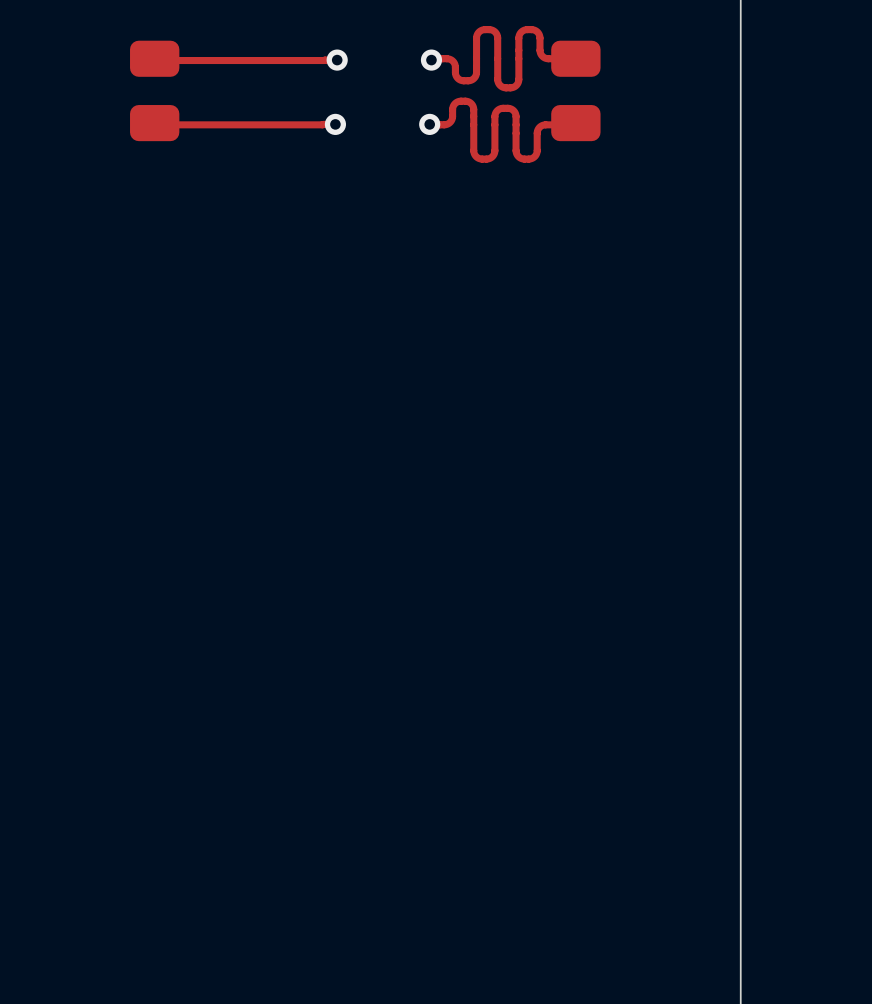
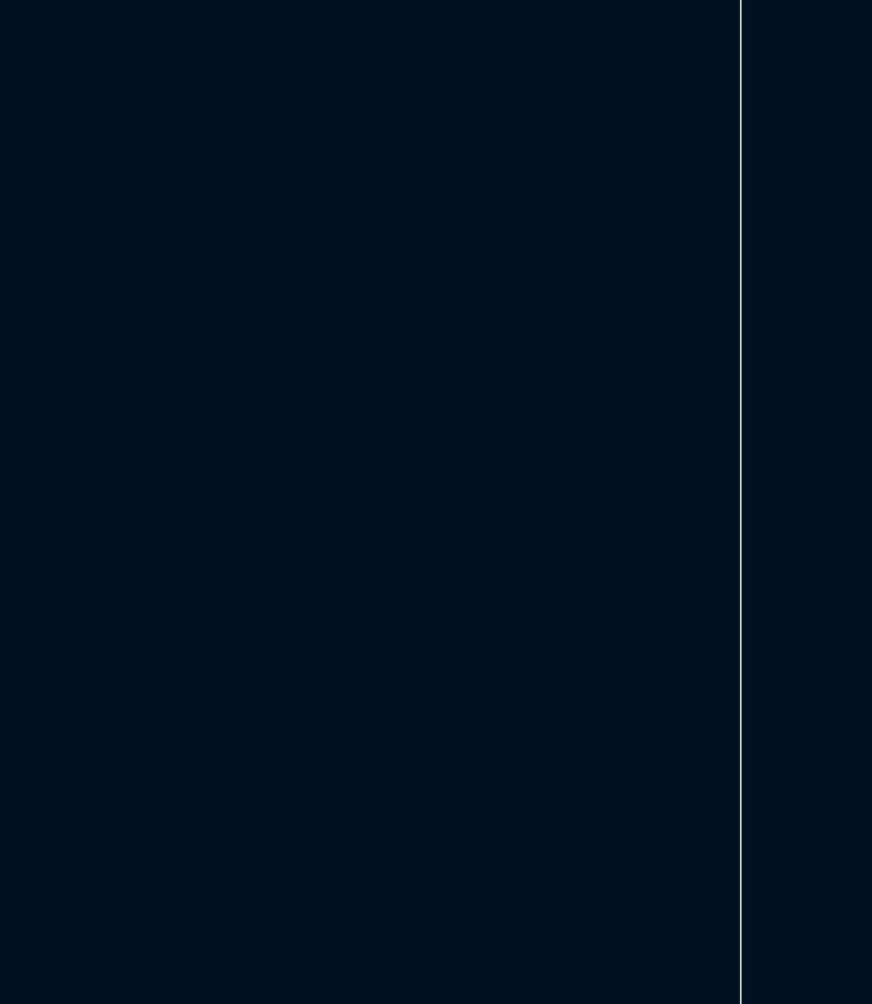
top track: (154, 58) (156, 60) (324, 60) -> none
via: (337, 60) -> none
top track: (431, 60) (450, 59) (454, 64) (457, 78) (462, 80) (471, 79) (476, 73) (477, 35) (482, 30) (492, 30) (497, 37) (498, 82) (503, 87) (513, 87) (518, 80) (519, 35) (523, 30) (531, 29) (539, 34) (540, 52) (543, 56) (570, 58) (571, 60) -> none
via: (431, 60) -> none
part: (154, 90) -> none
part: (575, 90) -> none
top track: (154, 123) (156, 124) (322, 124) -> none
top track: (575, 123) (574, 124) (545, 124) (540, 126) (537, 132) (536, 153) (533, 157) (528, 159) (520, 158) (516, 153) (516, 115) (510, 108) (501, 108) (495, 112) (494, 151) (492, 156) (488, 158) (479, 158) (474, 153) (473, 108) (469, 102) (460, 101) (455, 103) (452, 119) (448, 123) (430, 124) -> none
via: (335, 124) -> none
via: (429, 124) -> none

